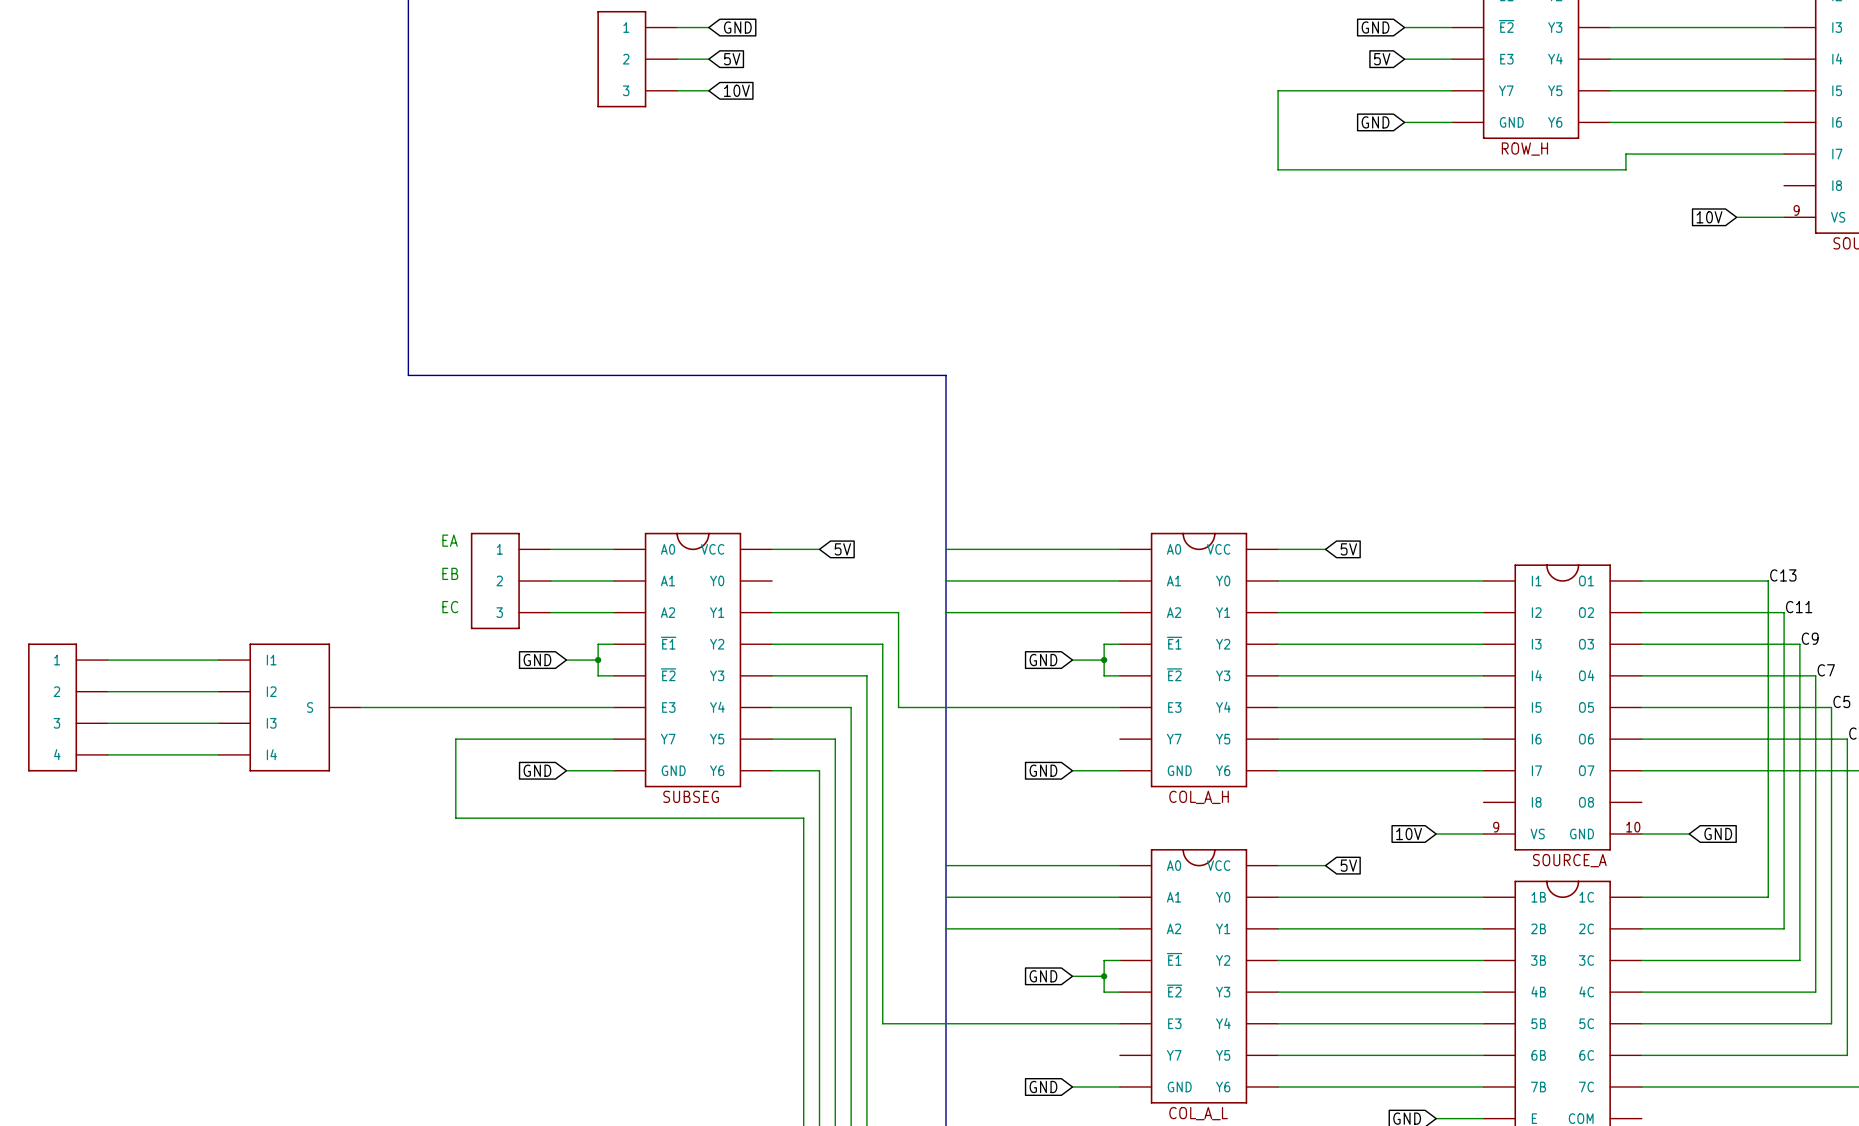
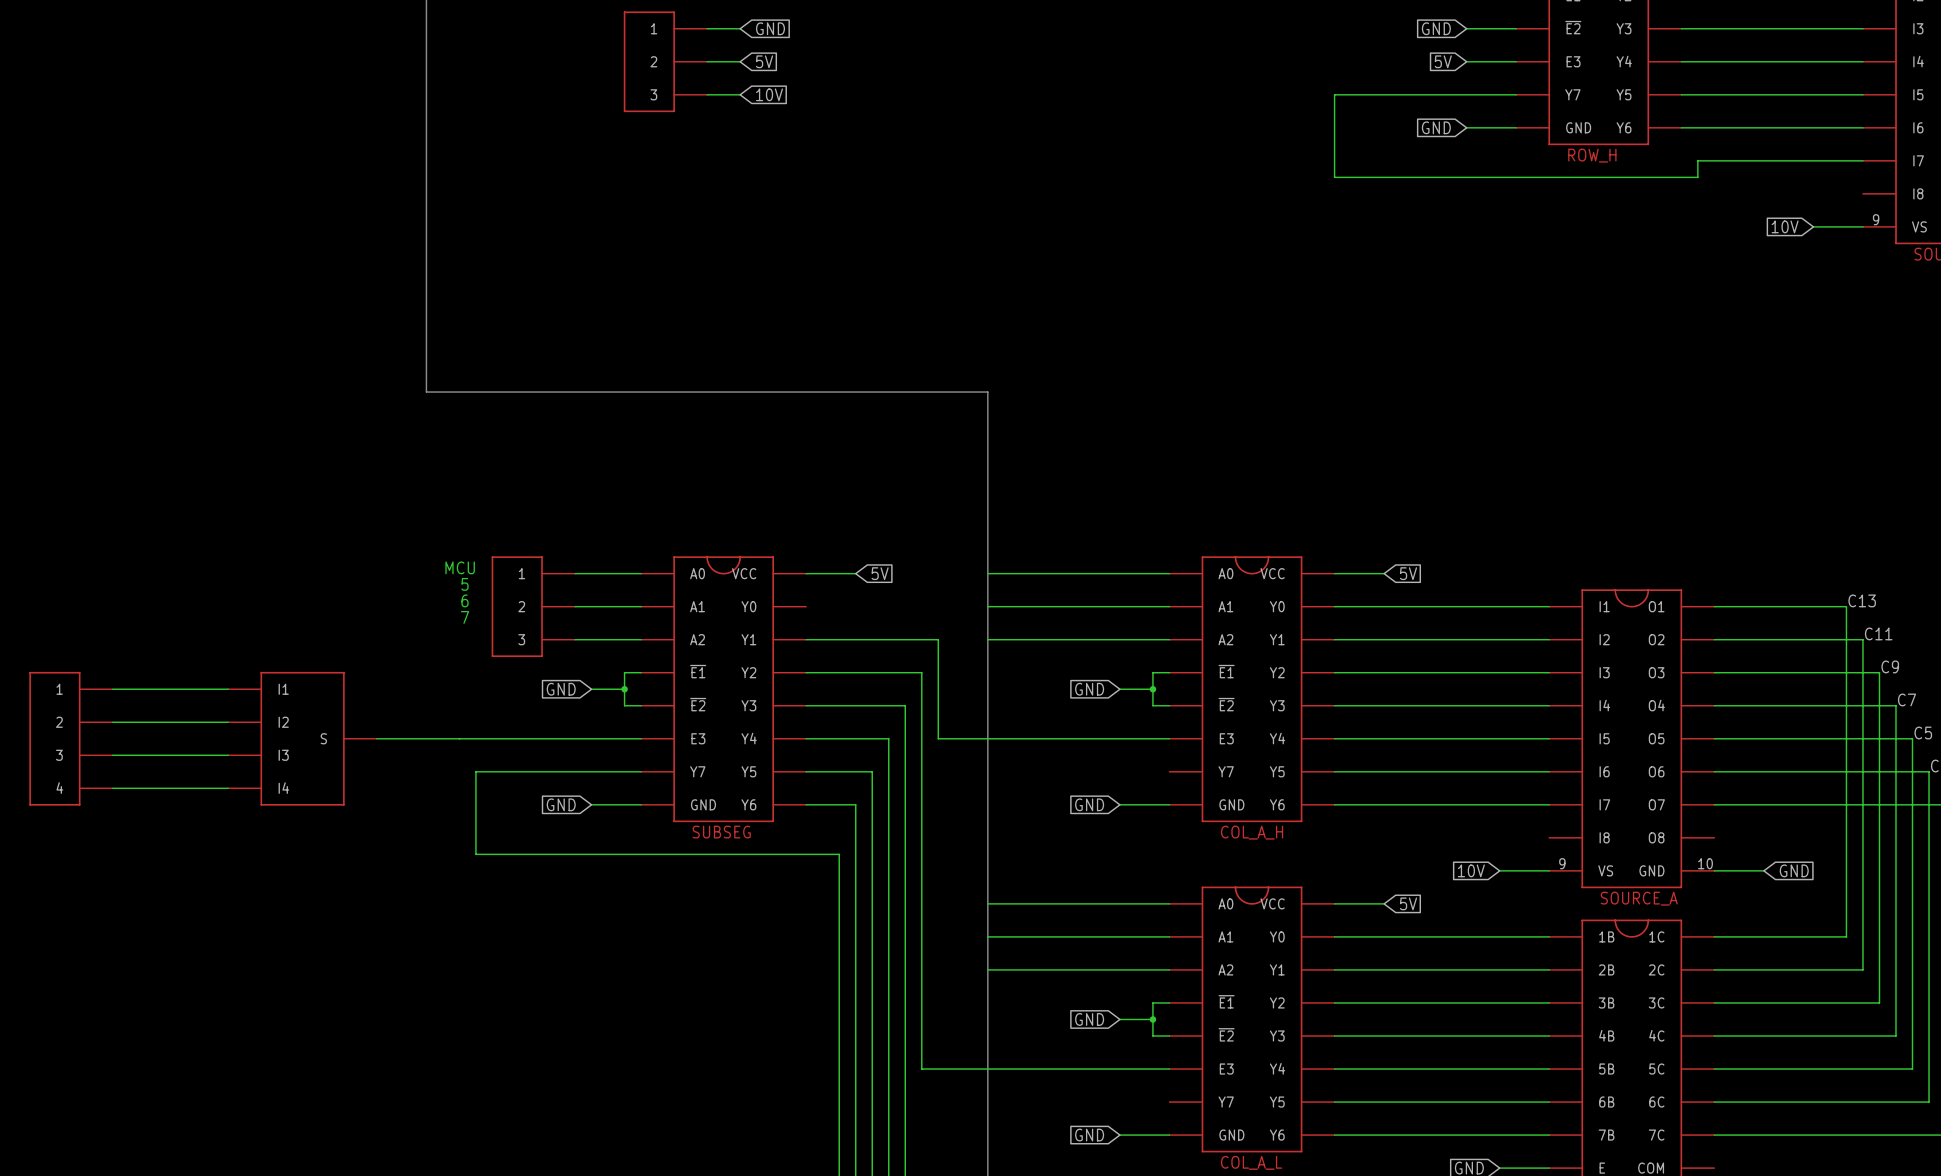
text: EA (450, 540) -> none
text: none -> MCU (460, 567)
text: none -> 5 (465, 584)
text: EB (450, 573) -> 6 (465, 600)
text: none -> 7 (465, 617)
text: EC (450, 607) -> none

